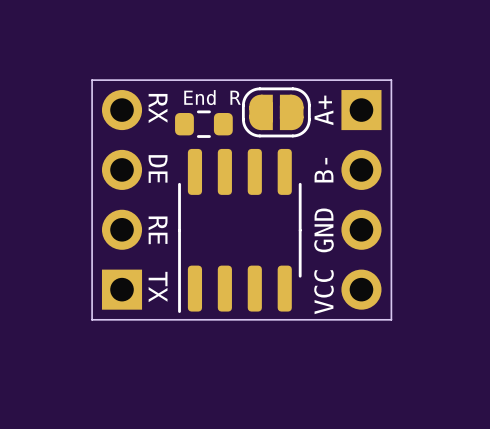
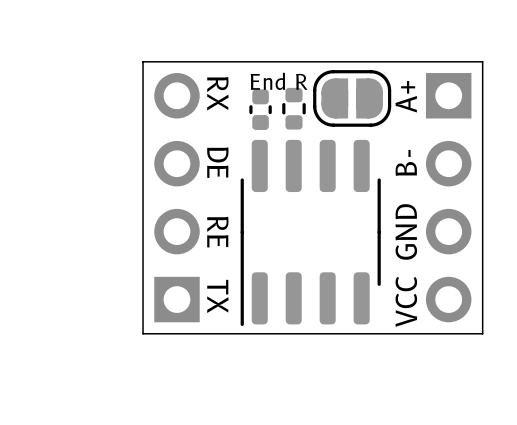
part footprint: [175, 110, 233, 138] -> [249, 89, 272, 131]
part: none -> (293, 108)

